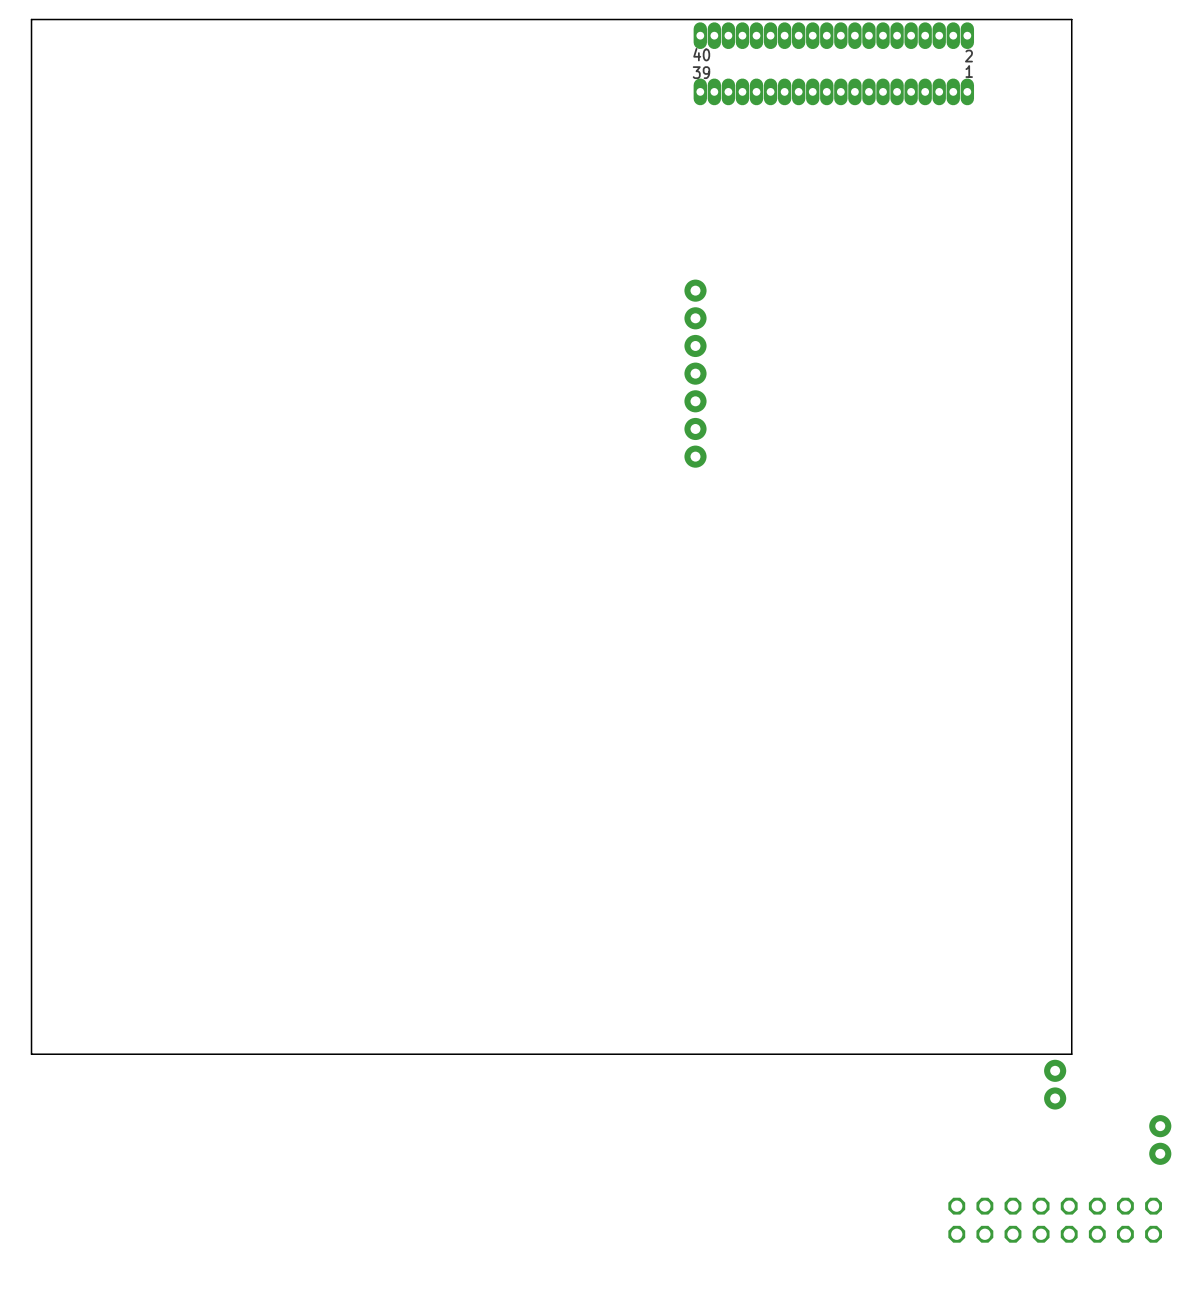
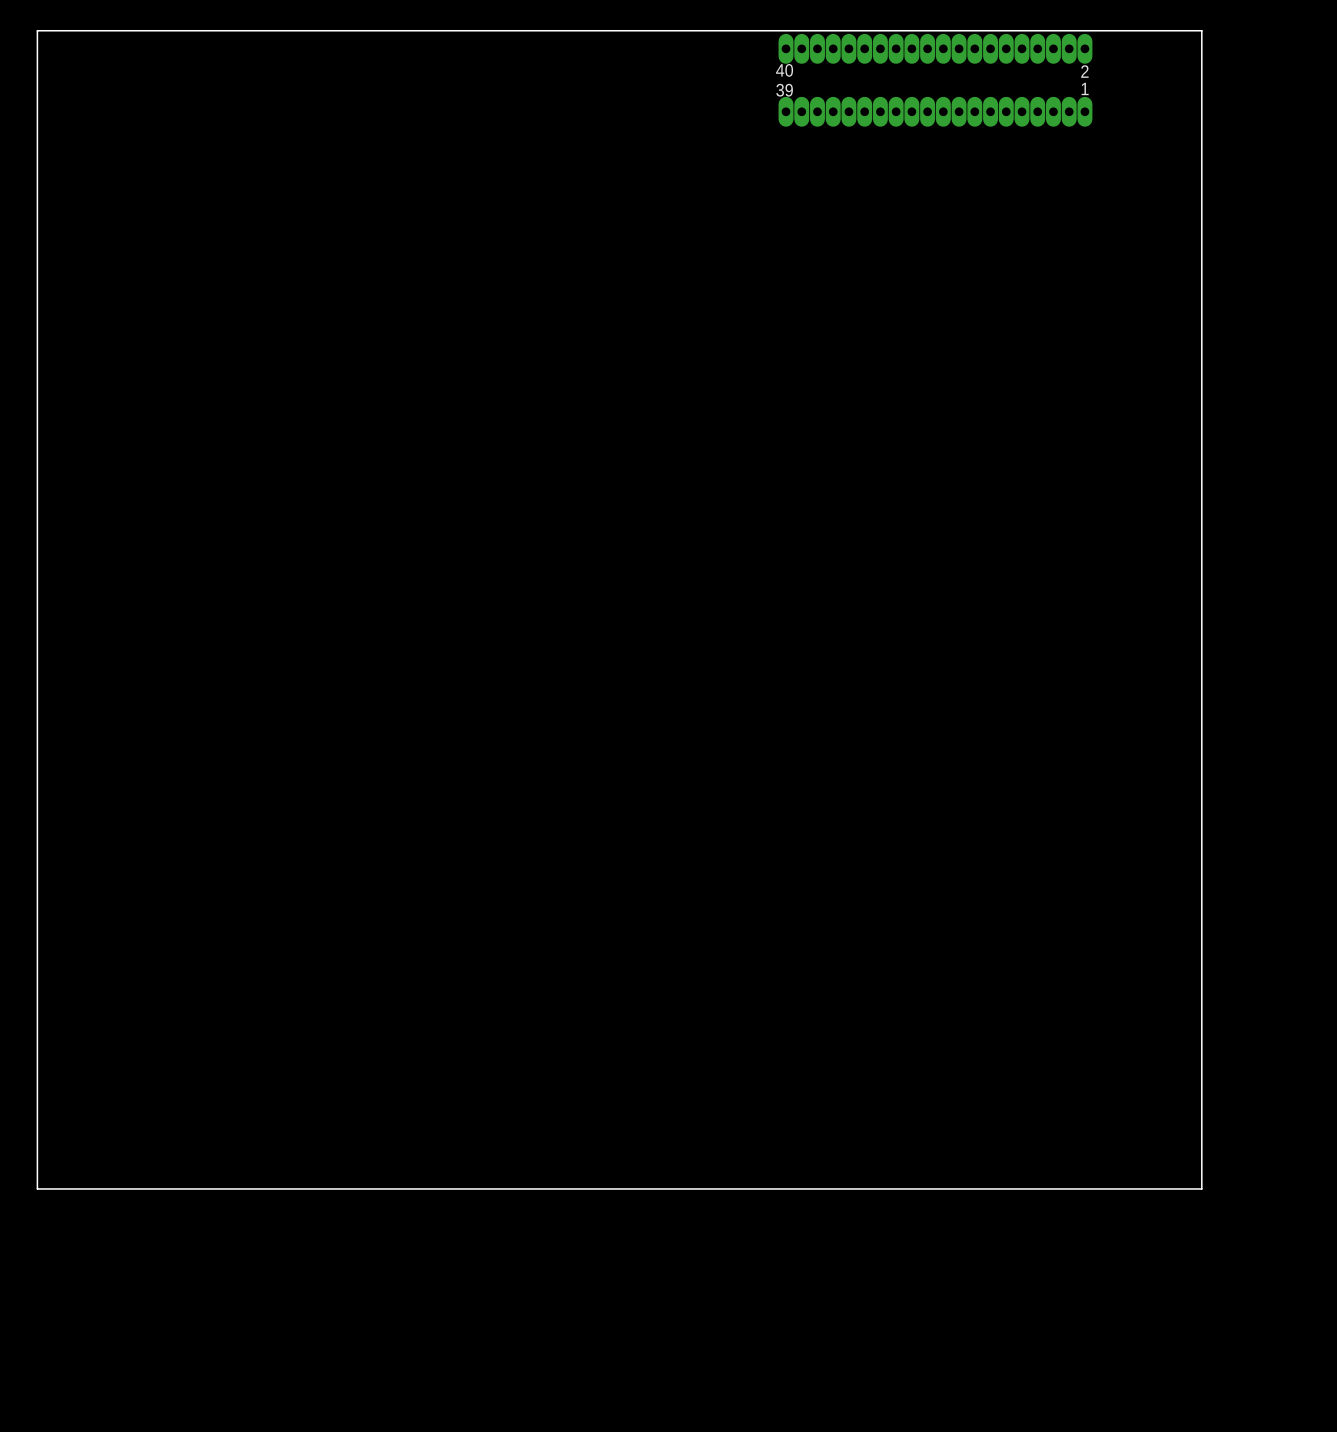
part: (695, 290) -> none
part: (695, 318) -> none
part: (695, 345) -> none
part: (695, 373) -> none
part: (695, 401) -> none
part: (695, 428) -> none
part: (695, 456) -> none
part: (1055, 1070) -> none
part: (1055, 1098) -> none
part: (1160, 1126) -> none
part: (1160, 1153) -> none
part: (1055, 1220) -> none

